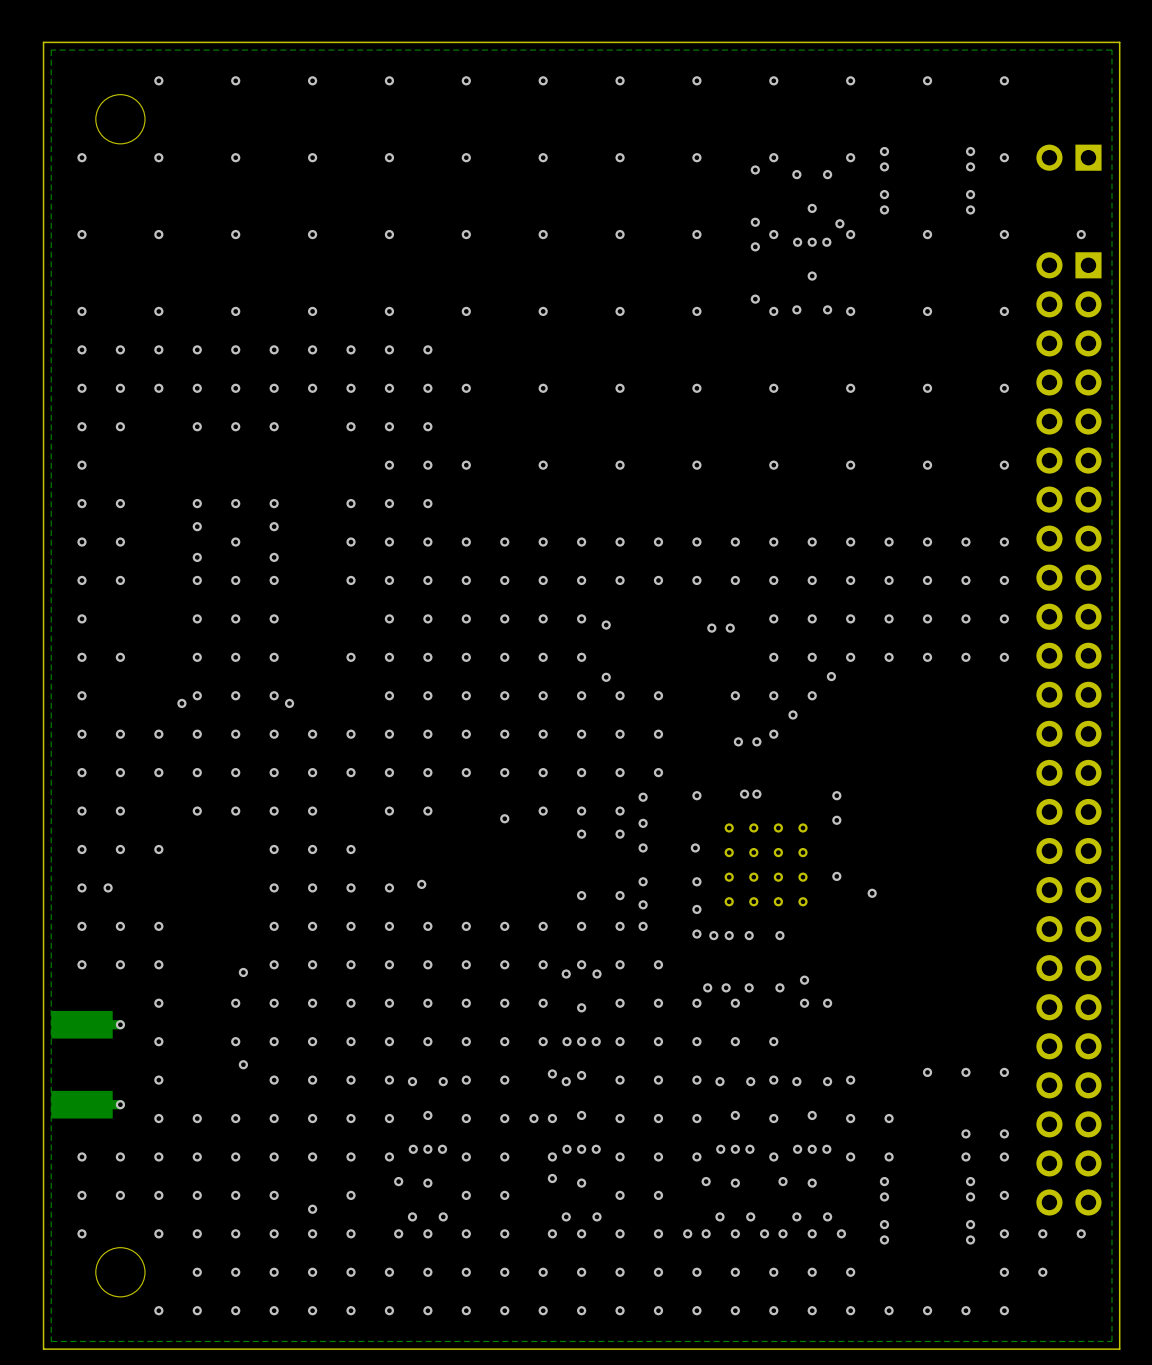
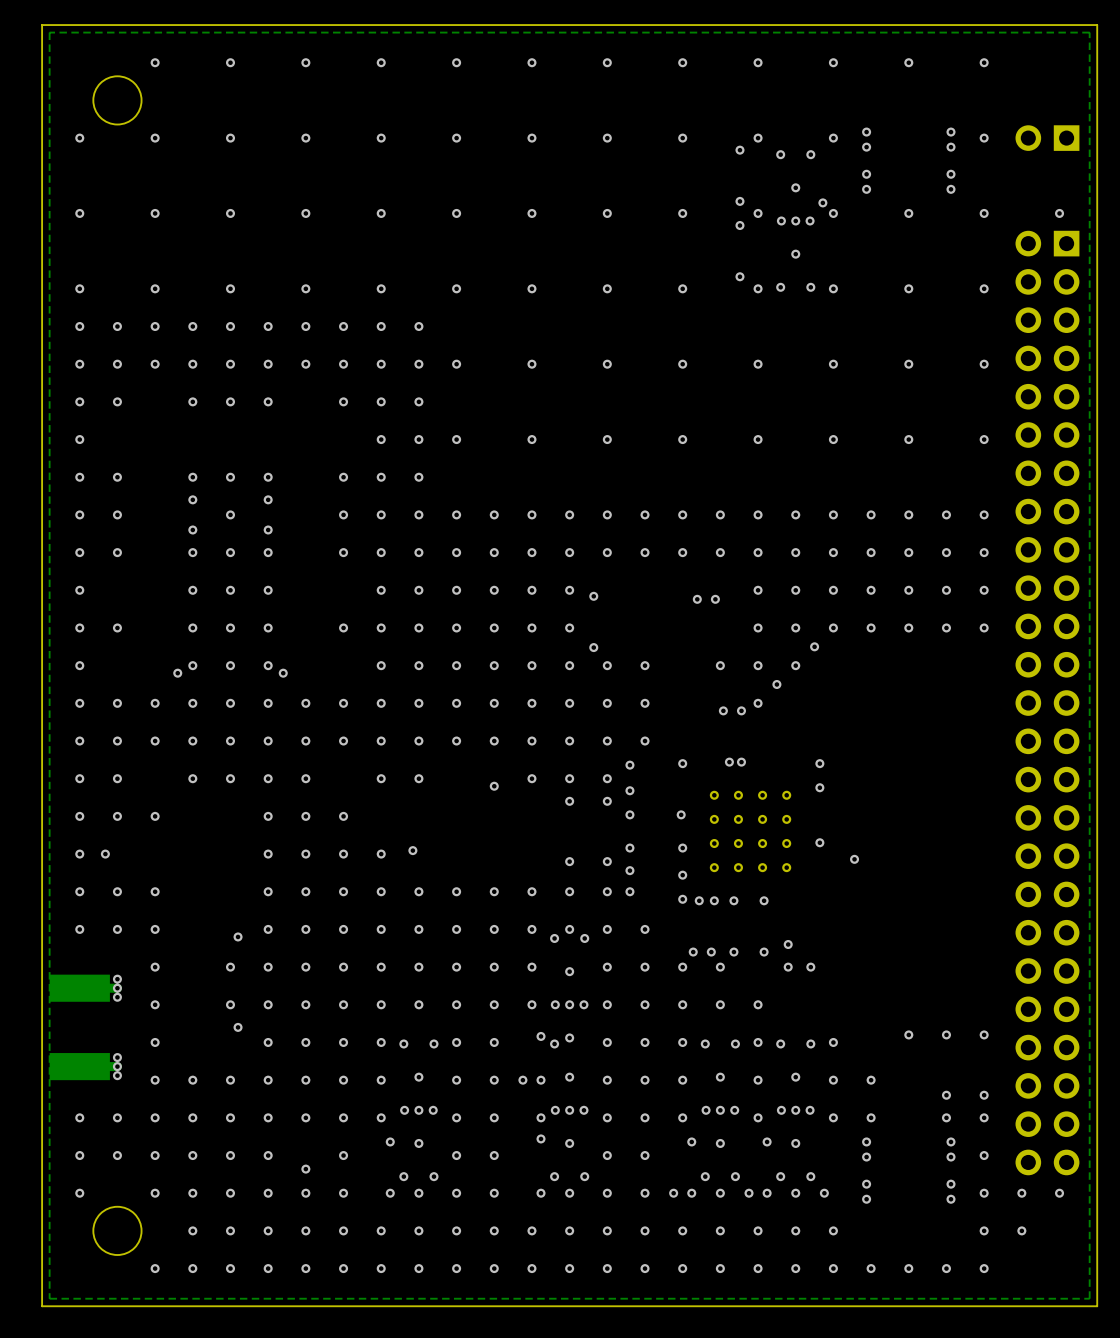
via: none -> (117, 979)
via: none -> (117, 997)
via: none -> (117, 1057)
via: none -> (117, 1075)

